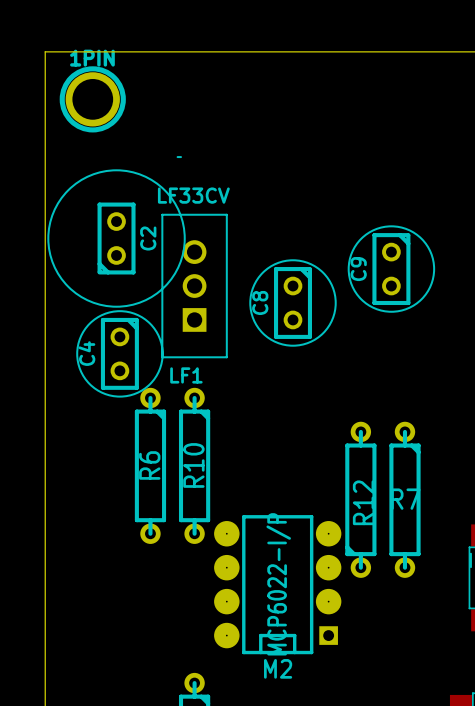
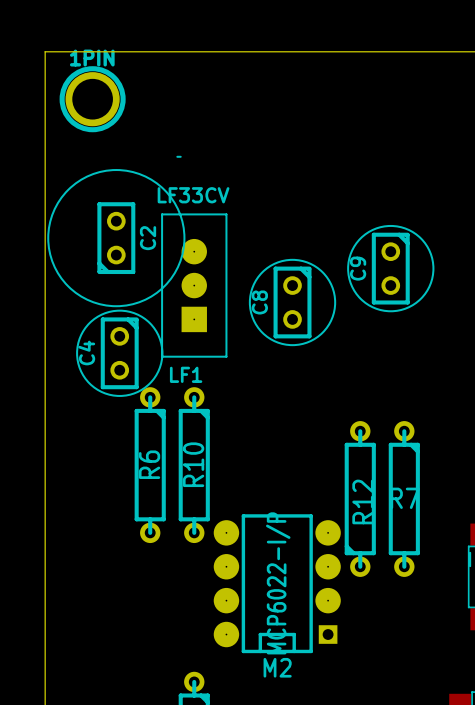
LF1 footprint: [161, 156, 228, 359] -> [161, 155, 228, 358]

